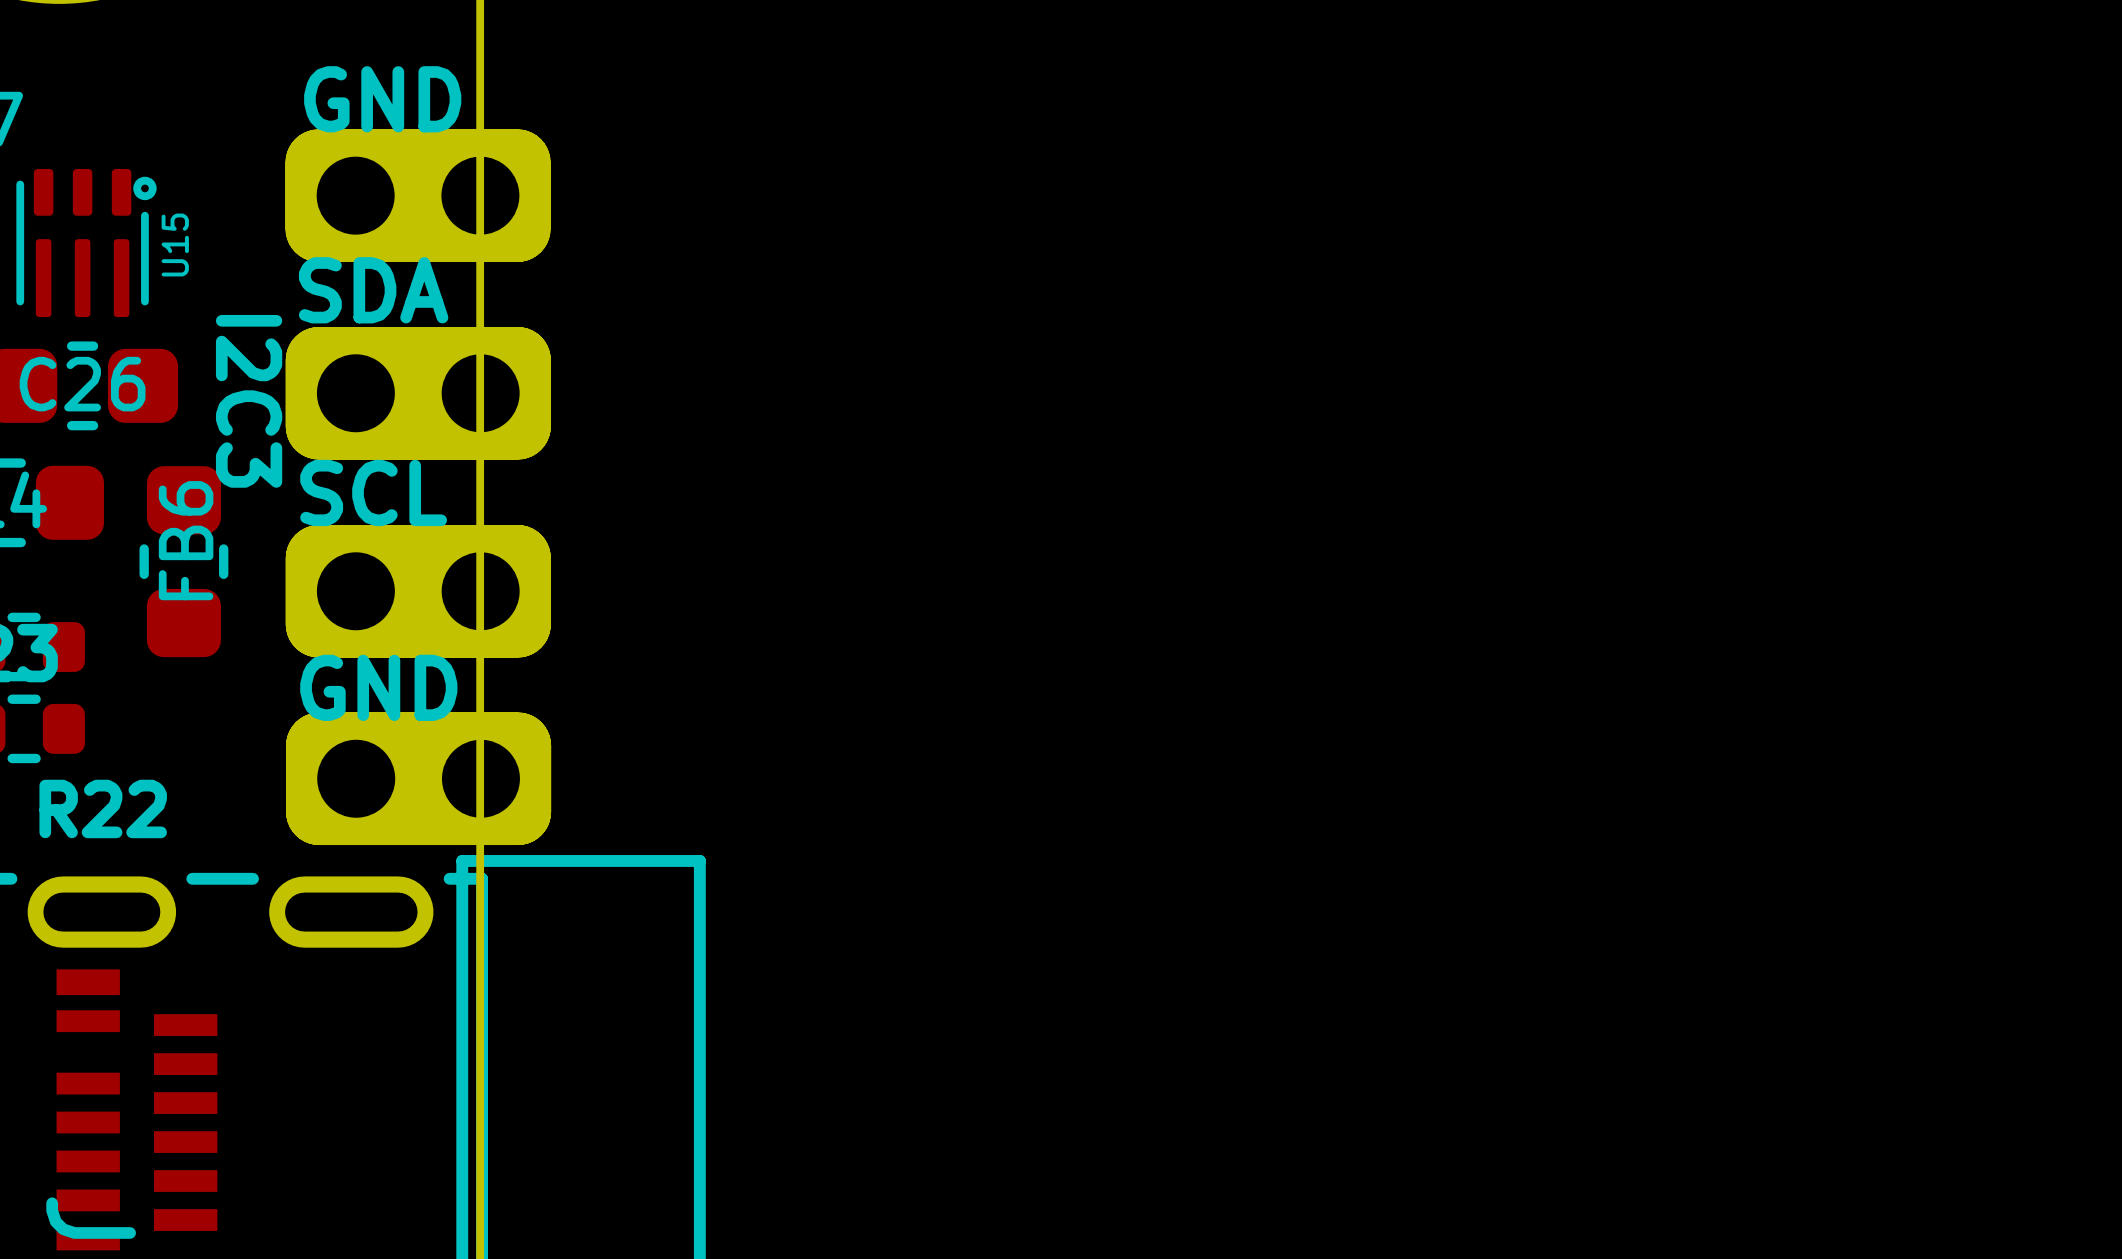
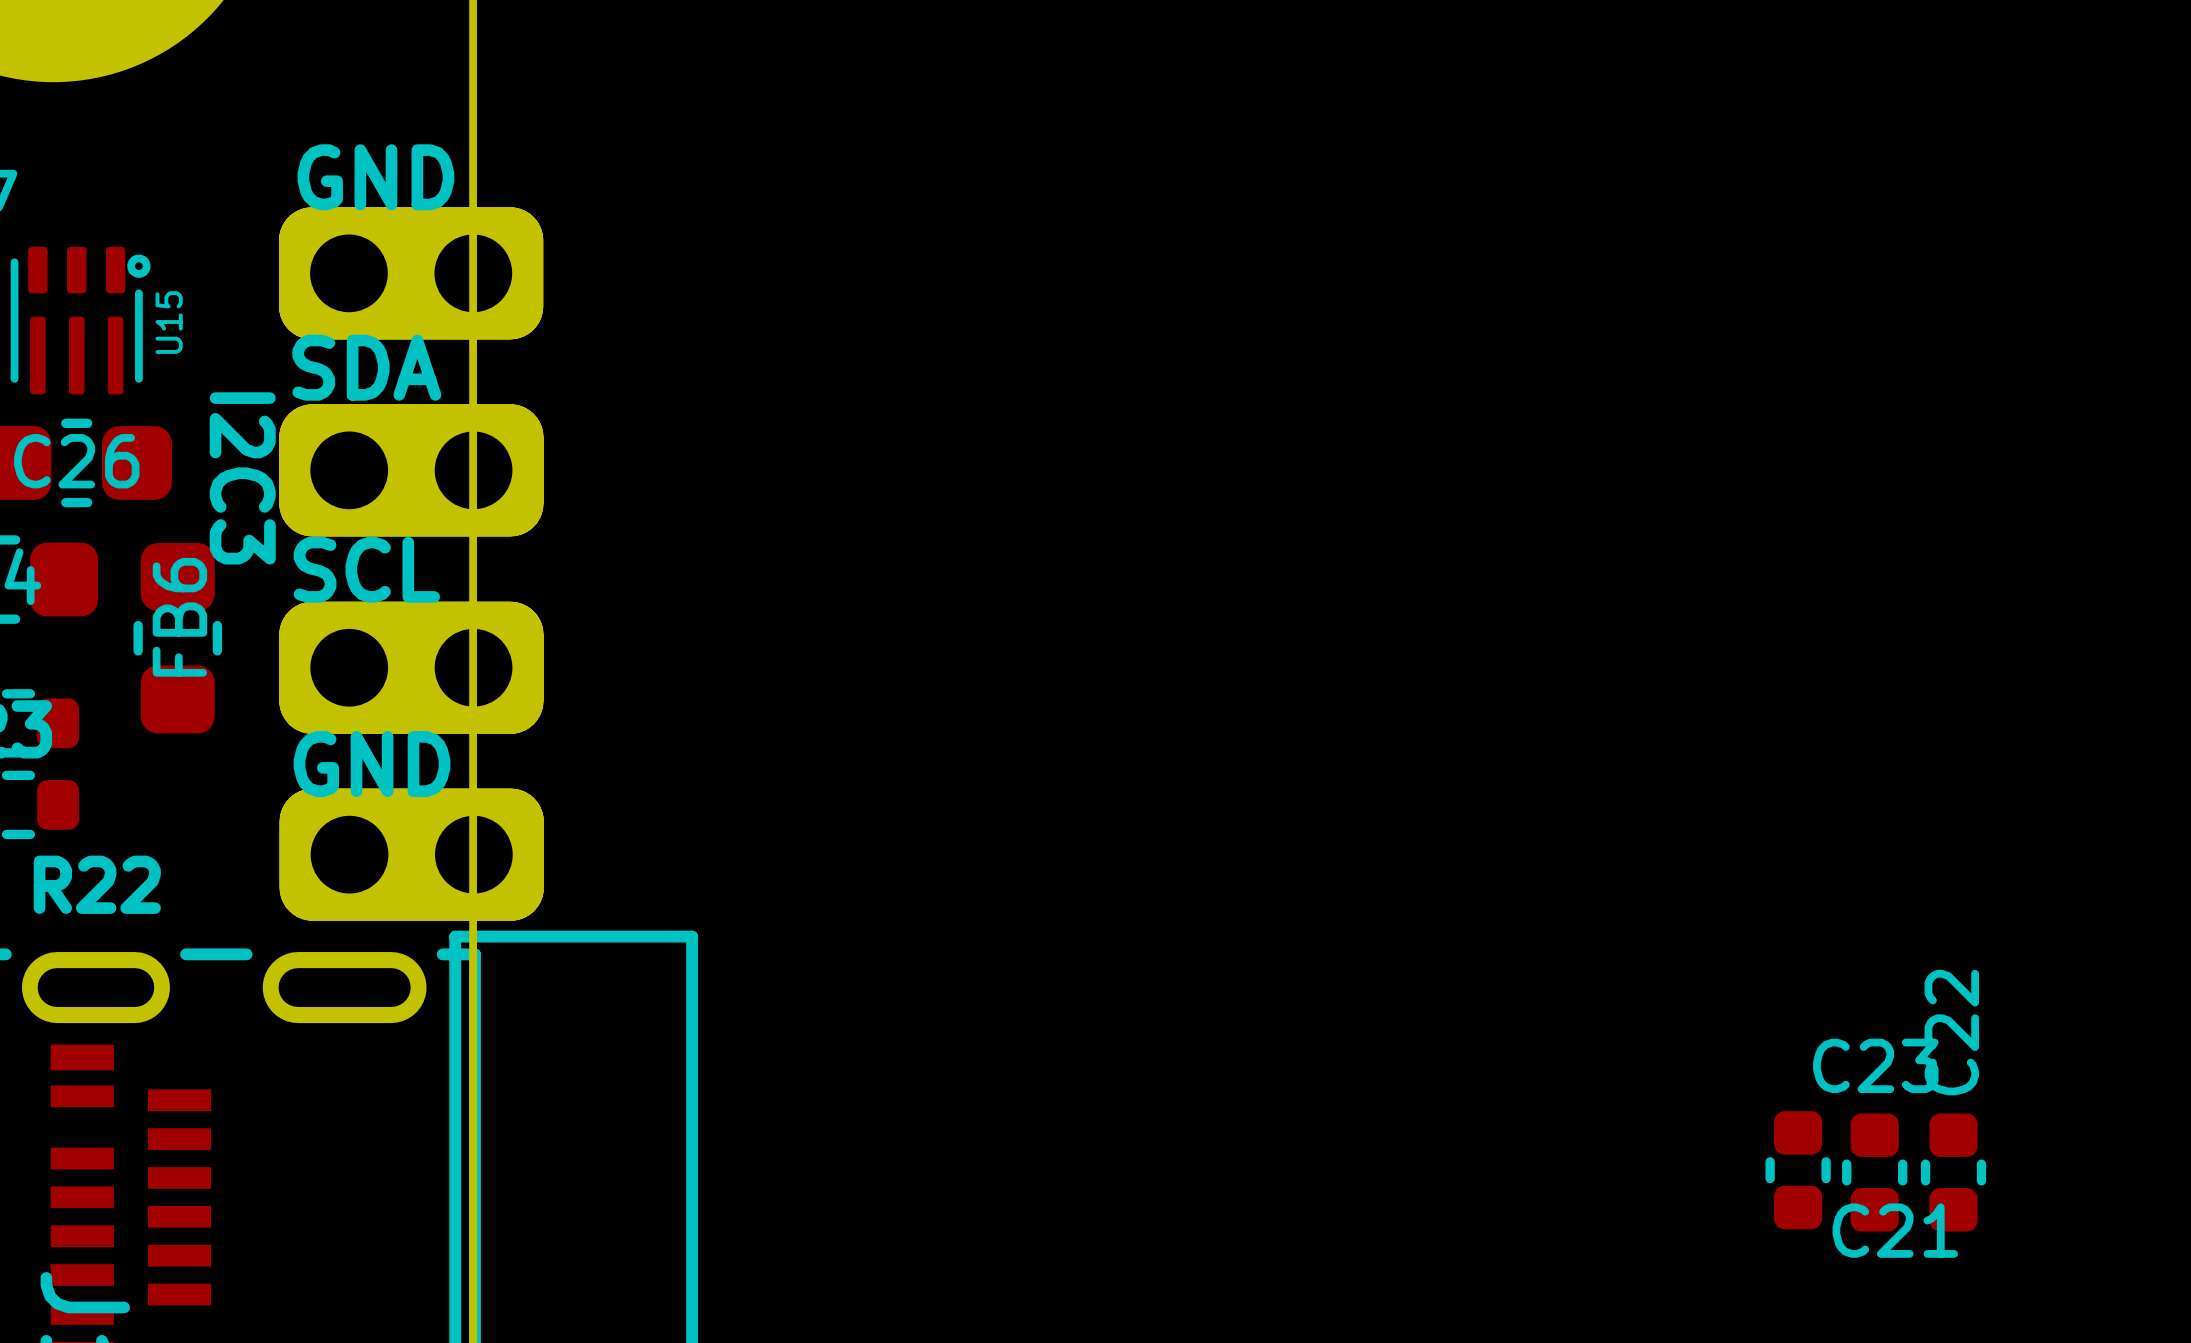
C21: none -> (1798, 1170)
C23: none -> (1874, 1172)
C22: none -> (1953, 1172)

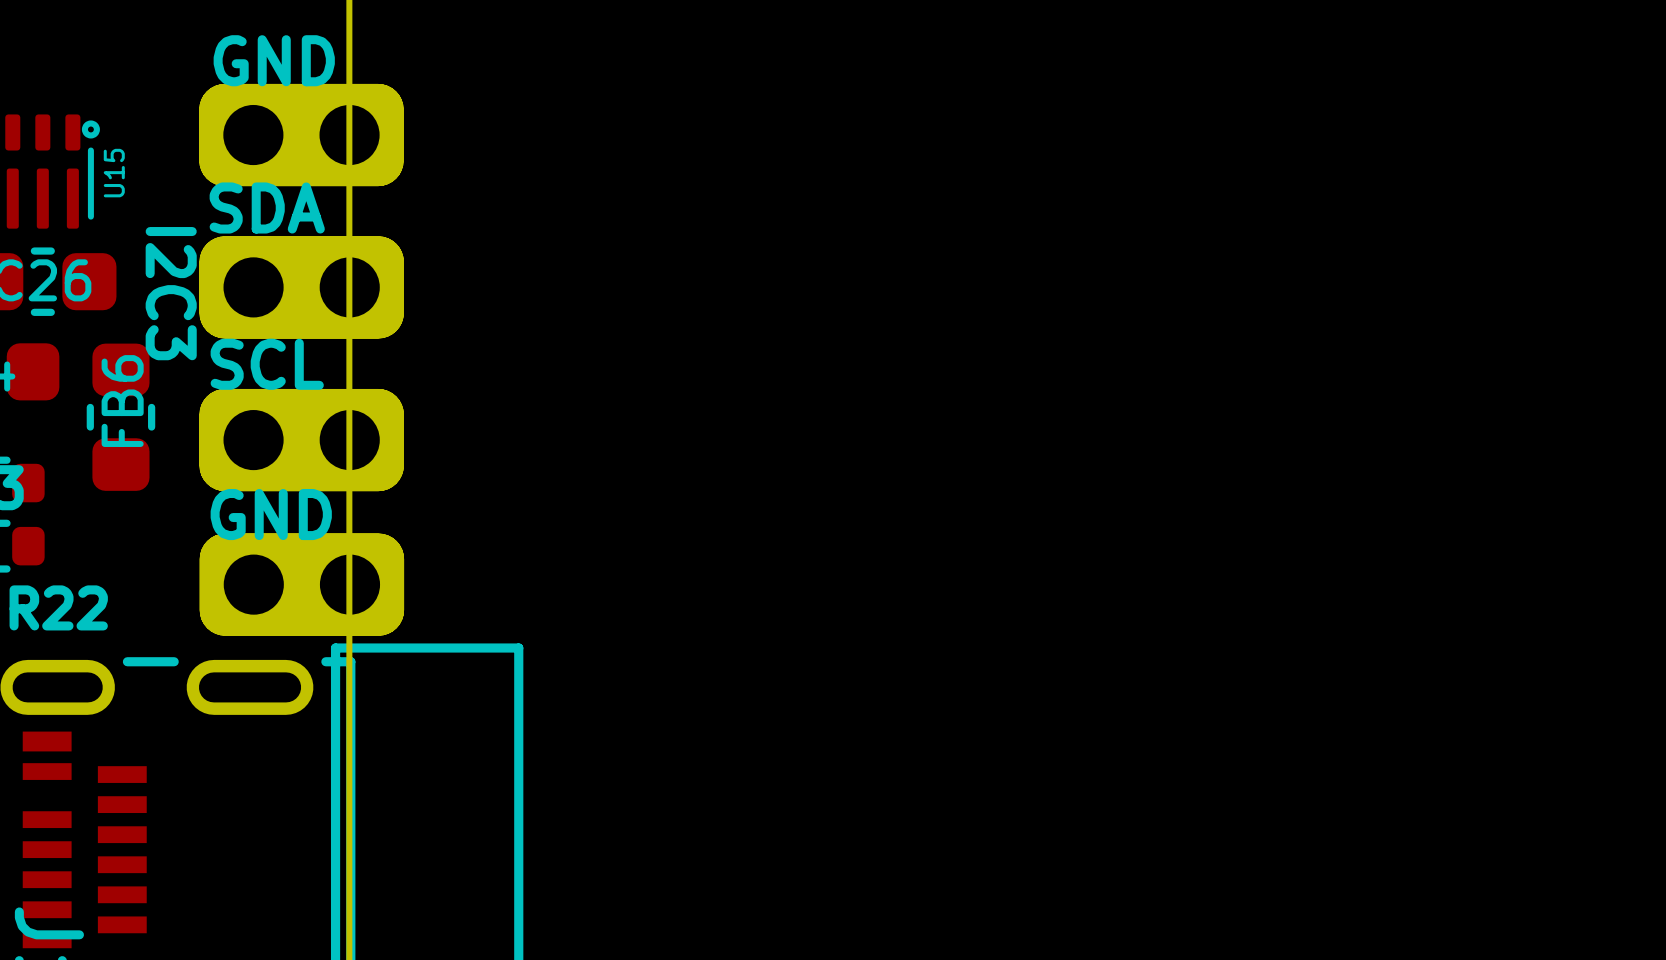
C21: (1798, 1170) -> none
C23: (1874, 1172) -> none
C22: (1953, 1172) -> none

